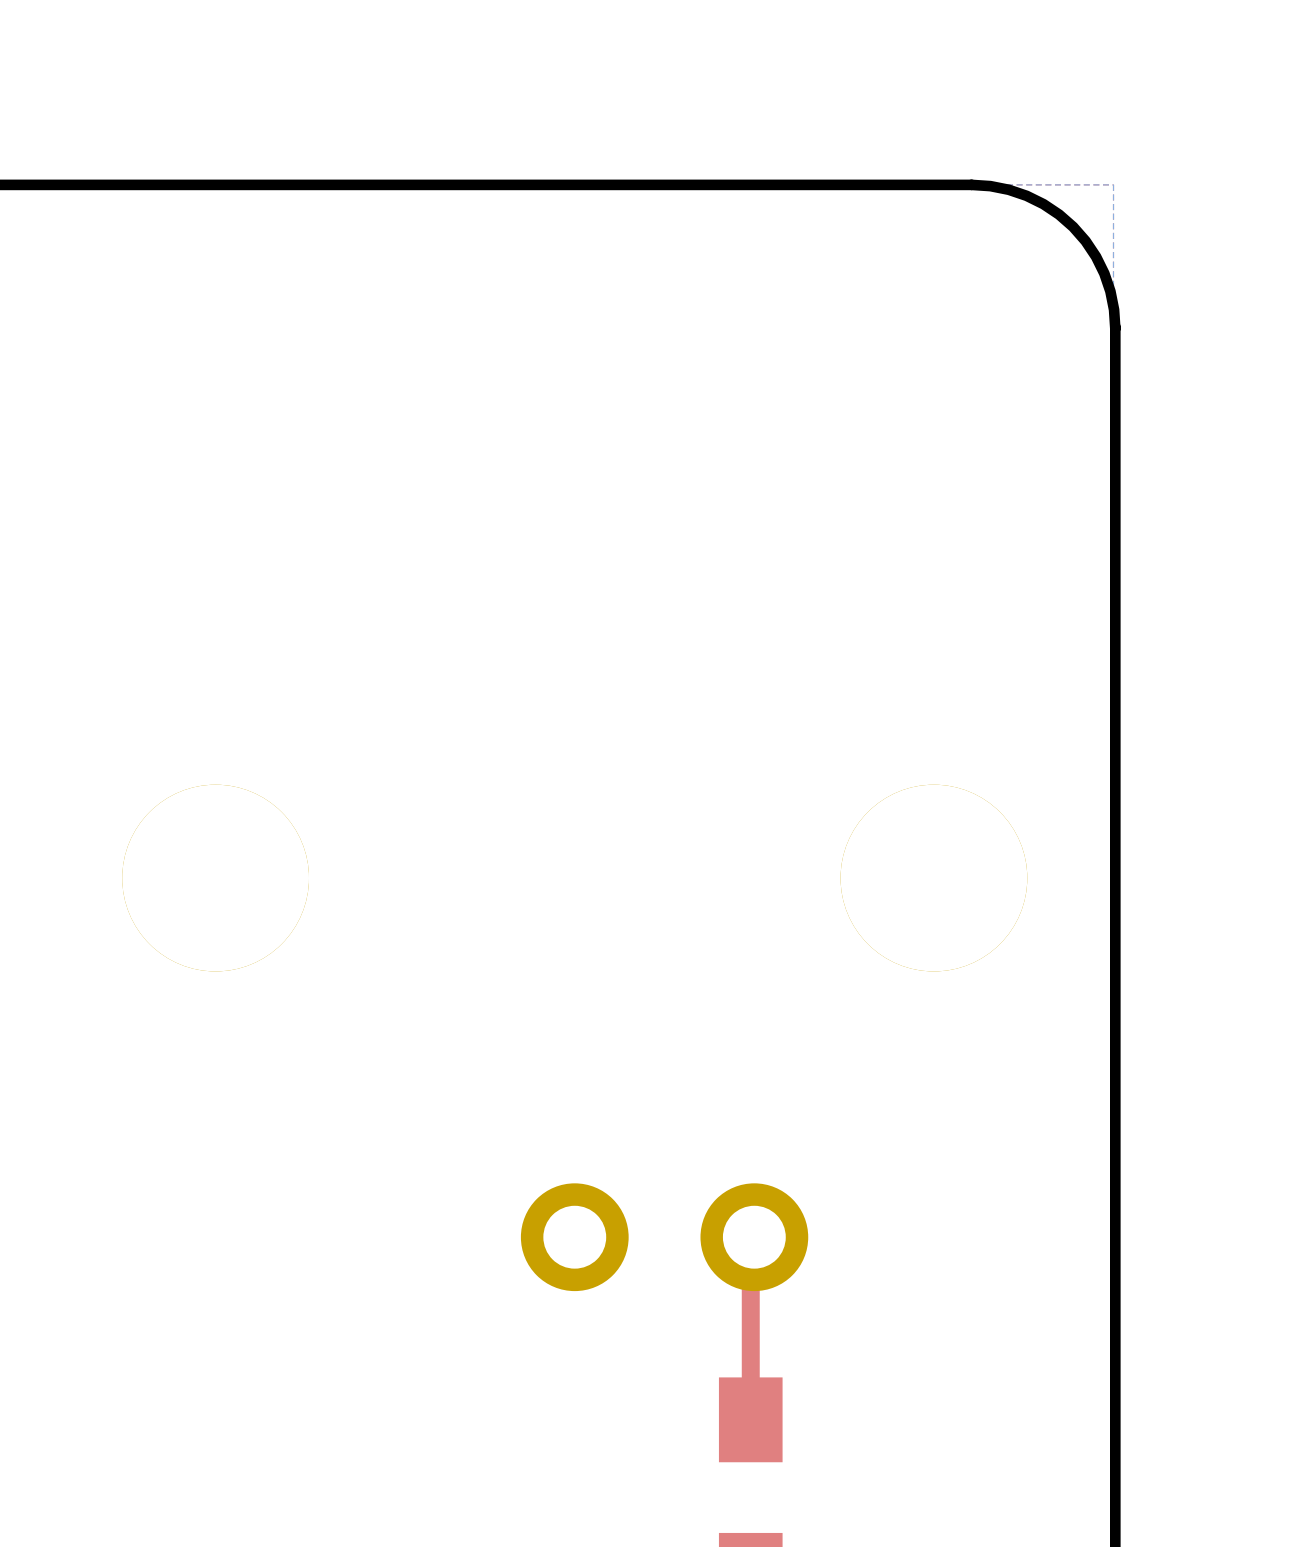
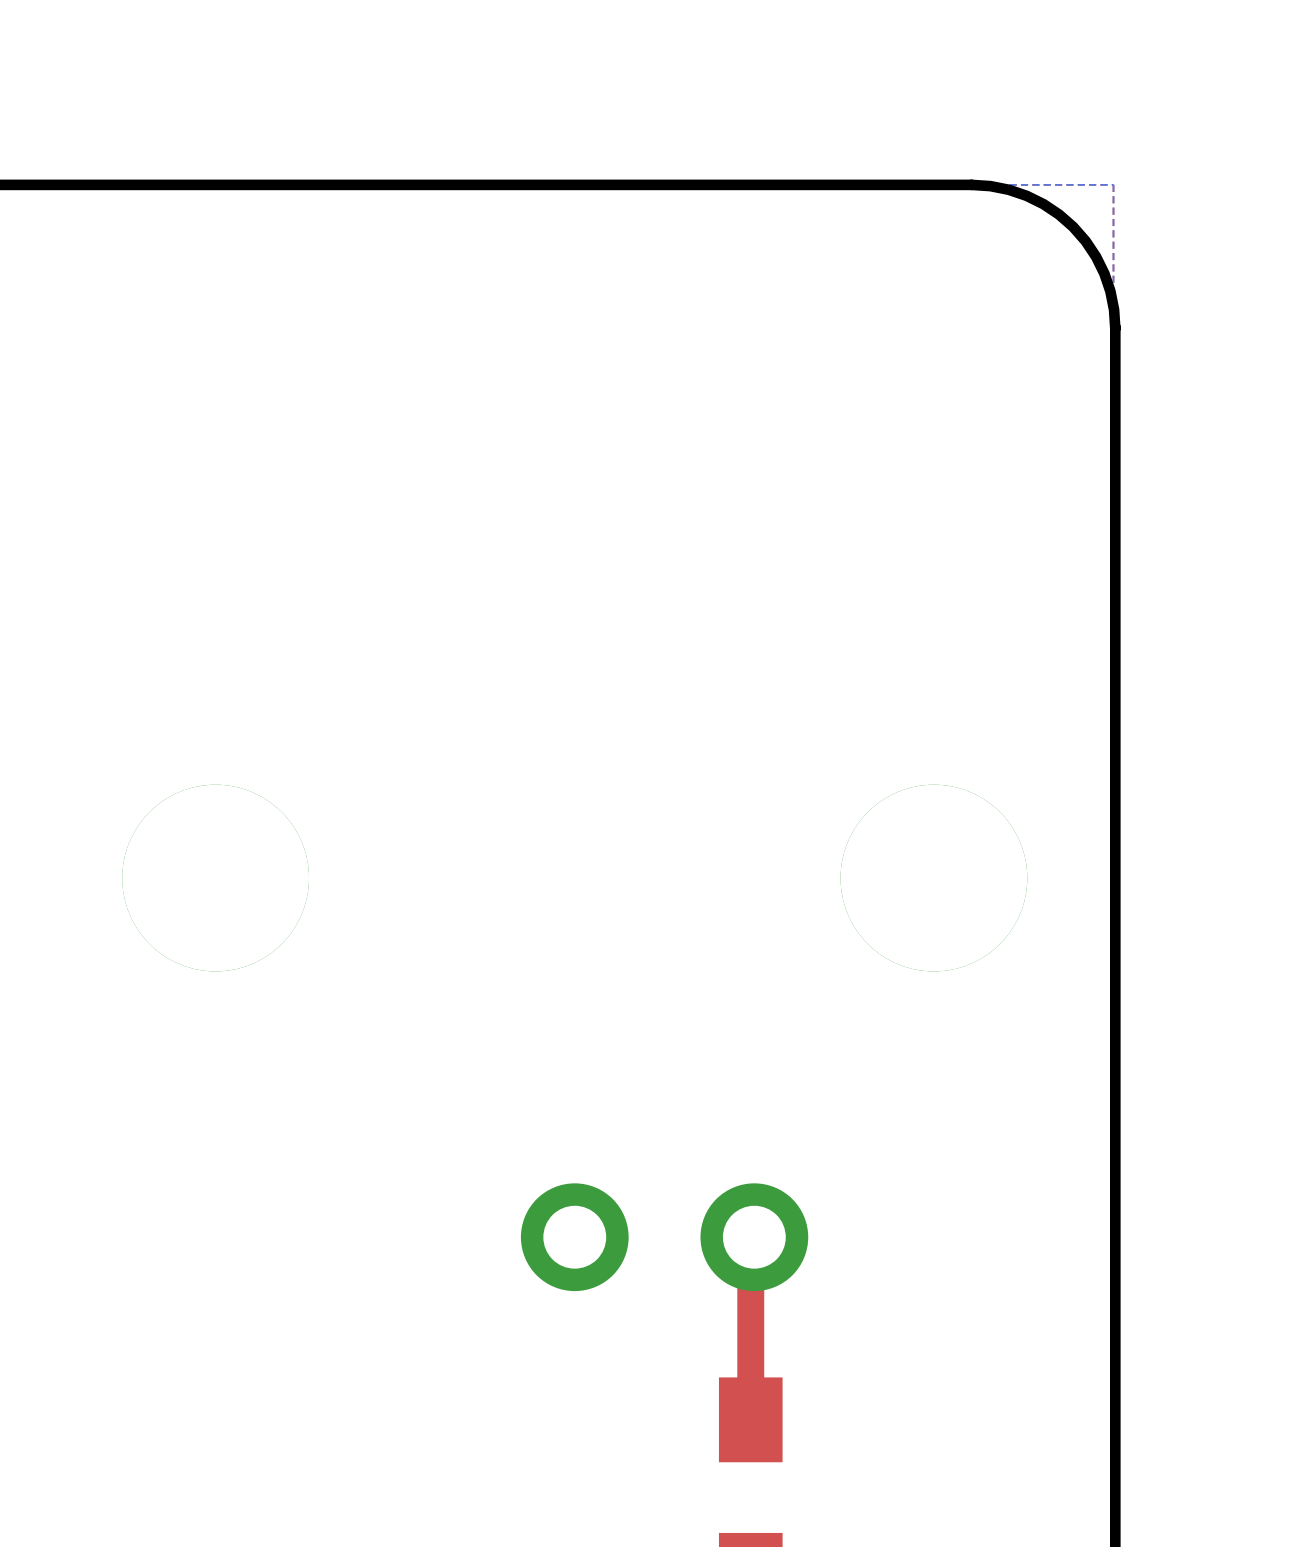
top track width: thin (754, 1237) (750, 1240) (750, 1419) -> thick (754, 1237) (750, 1240) (750, 1419)

